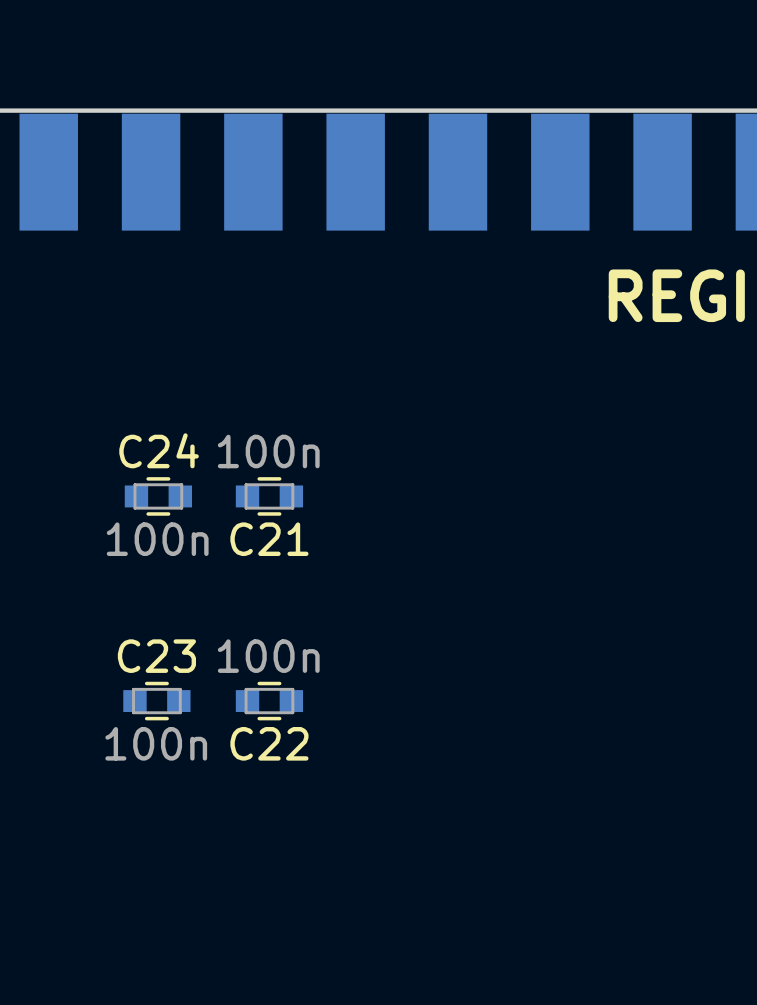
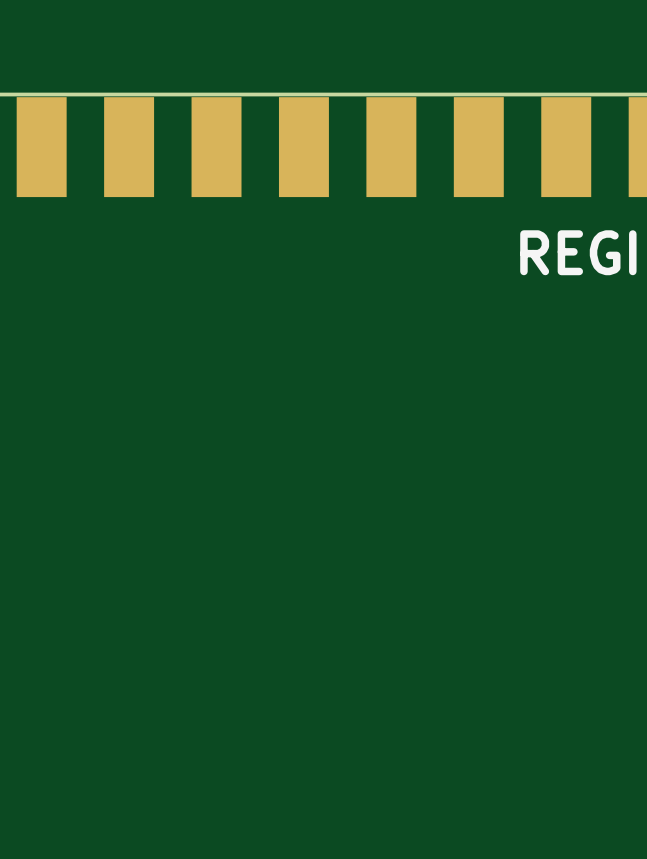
C24: 100n (158, 496) -> none
C21: 100n (269, 496) -> none
C23: 100n (156, 701) -> none
C22: 100n (269, 701) -> none

